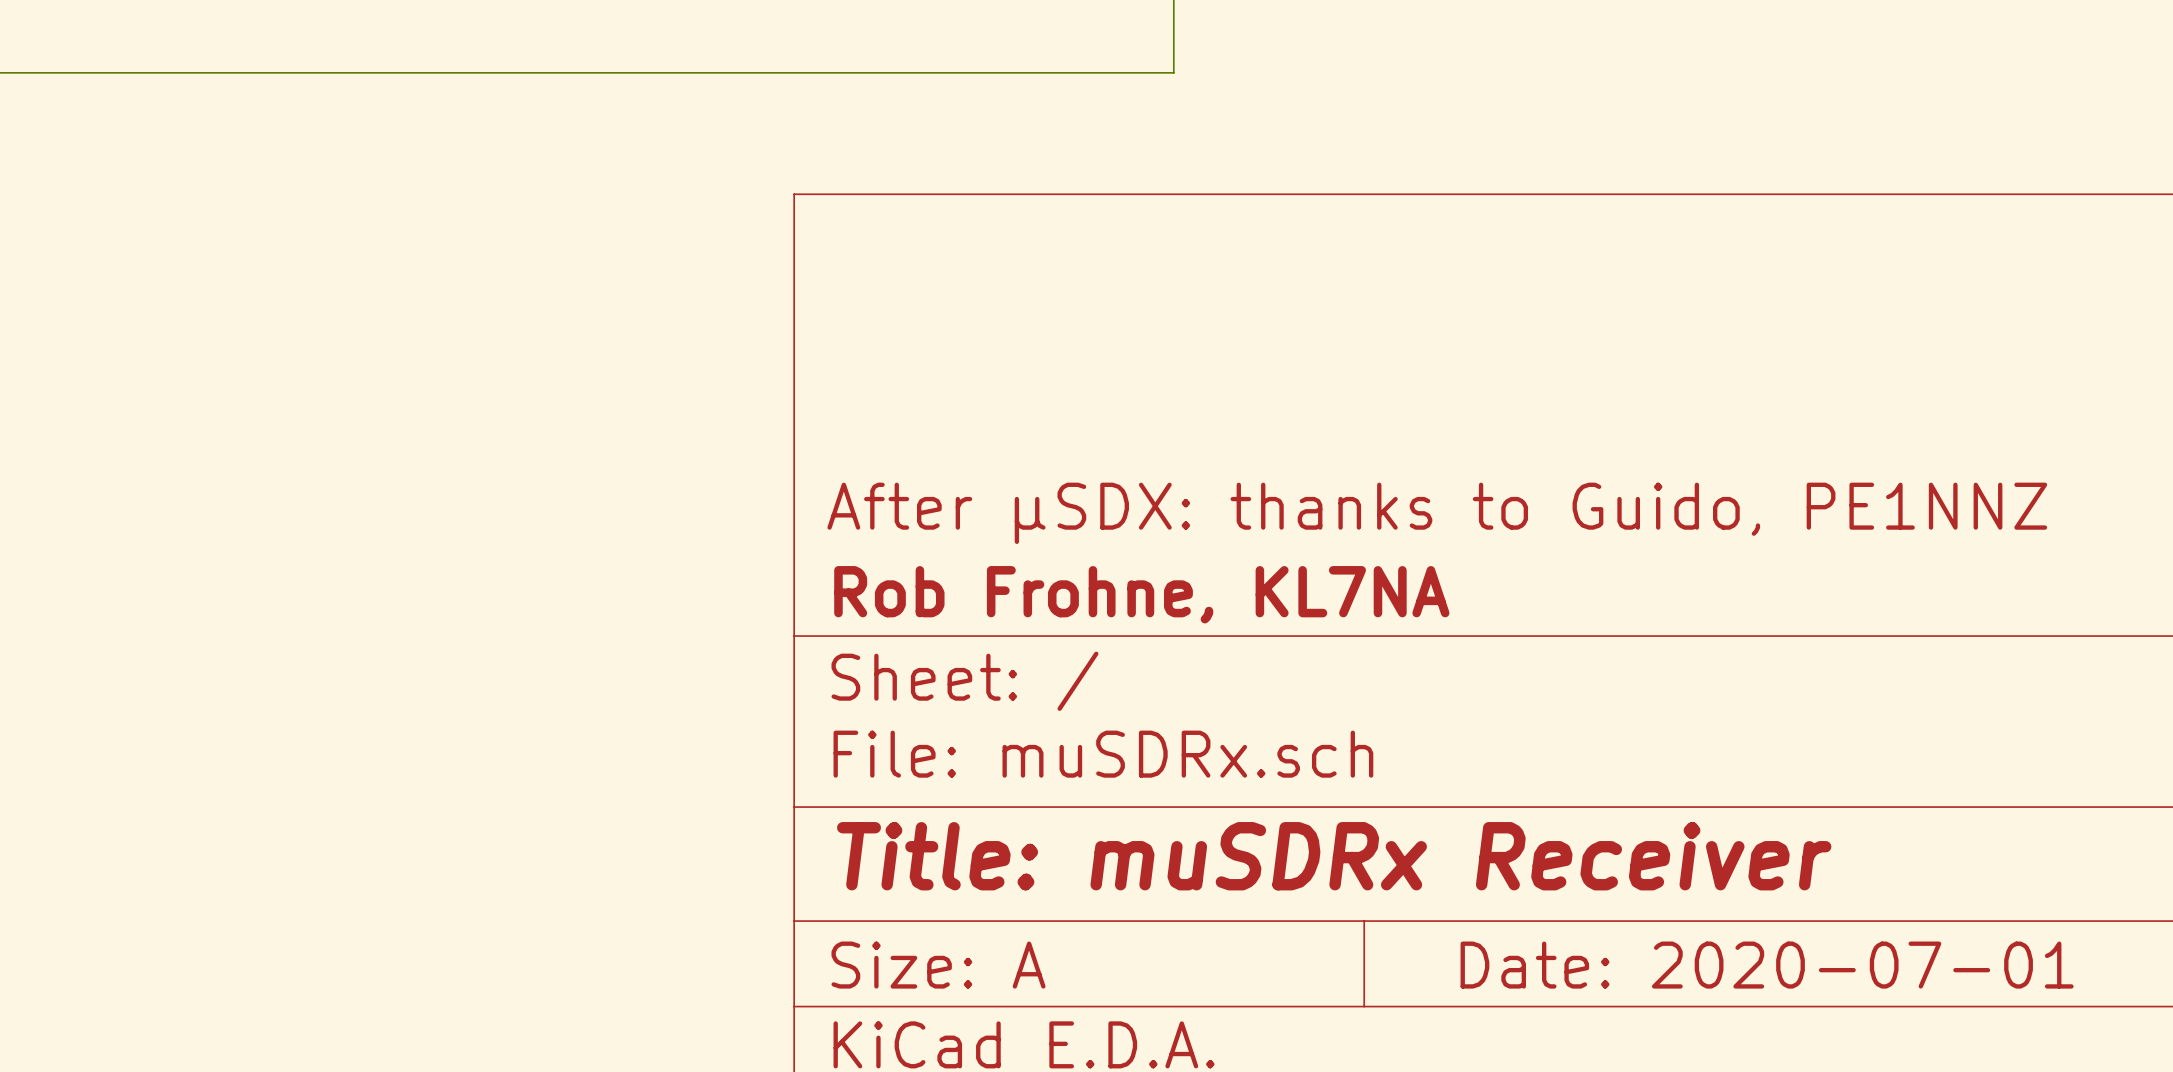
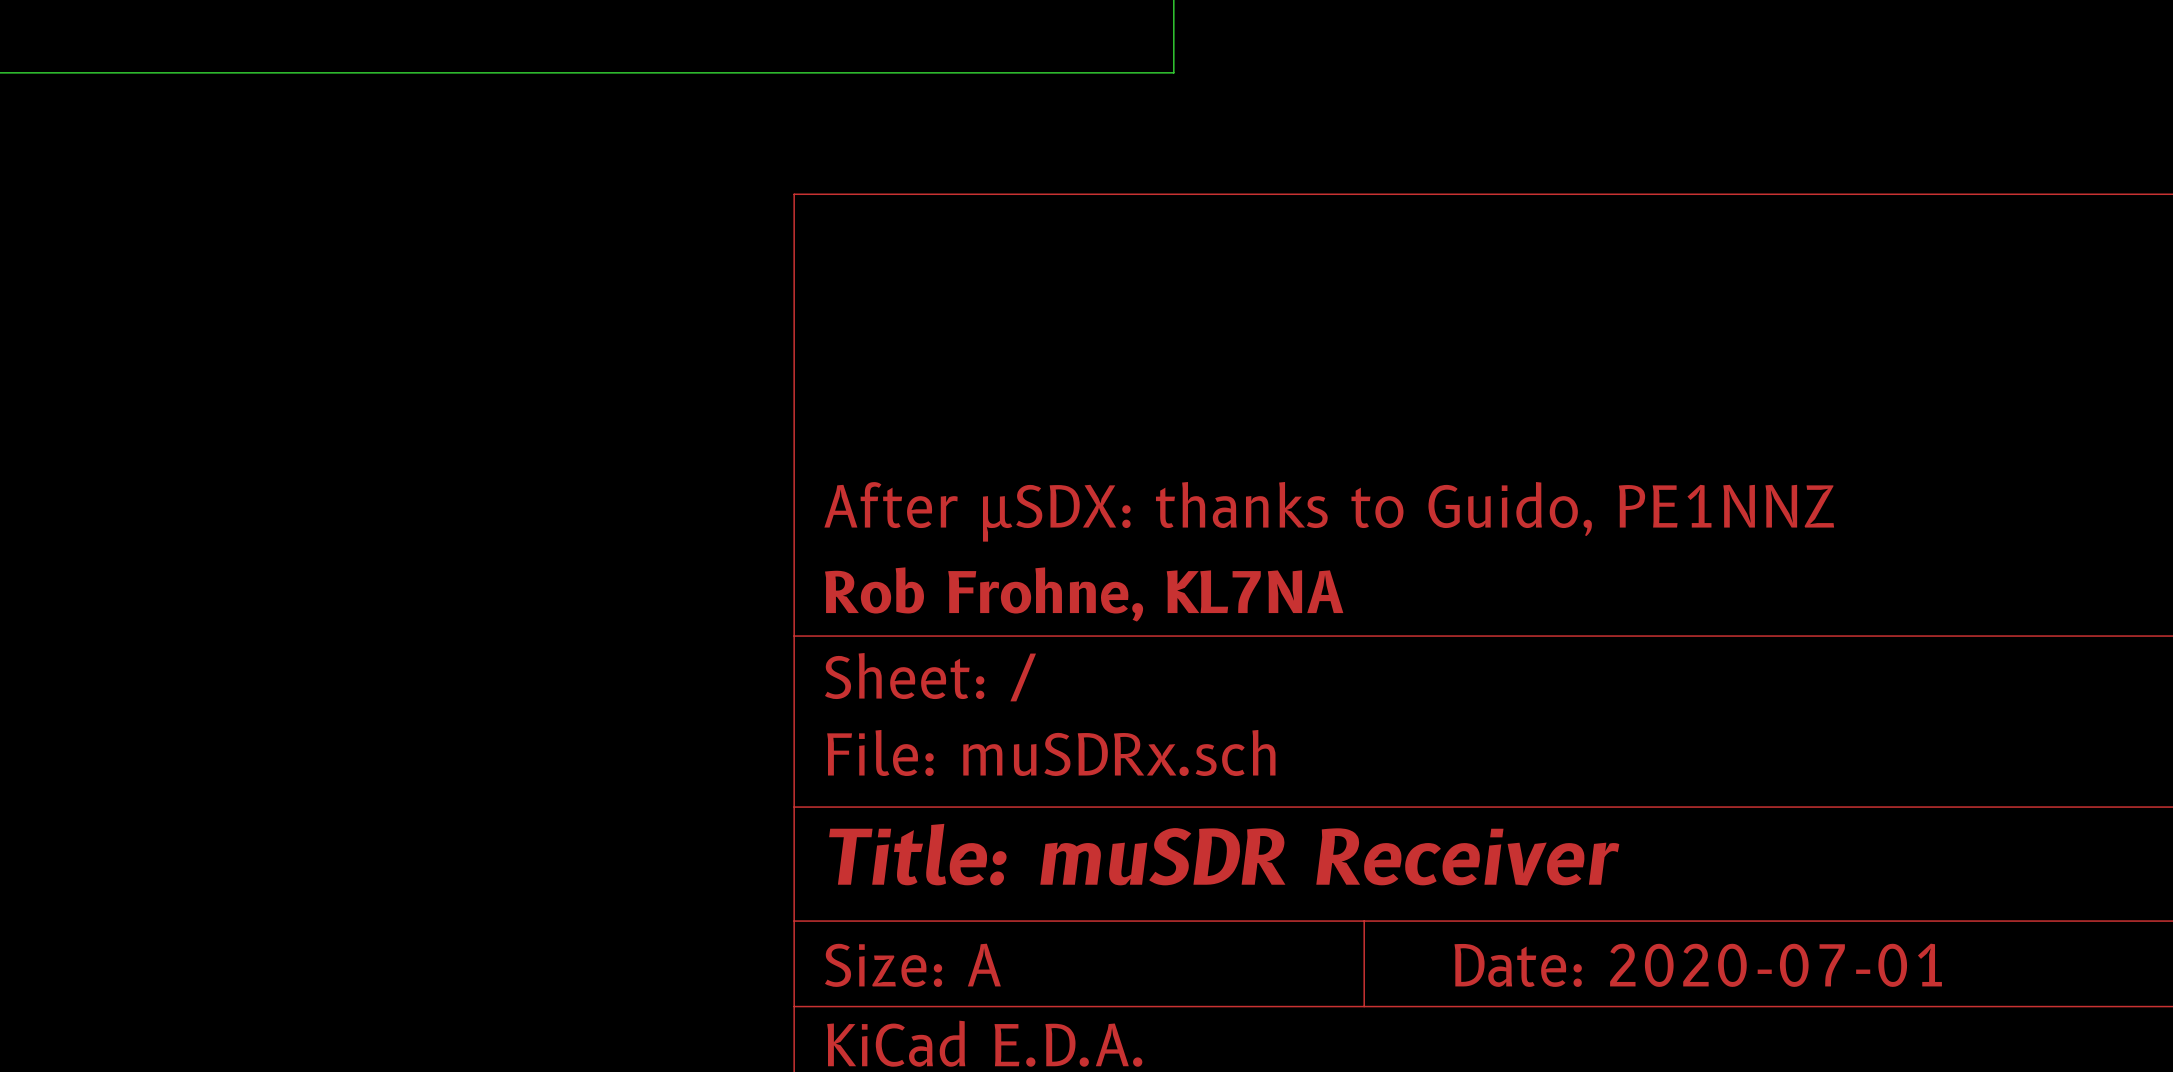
title block: Title: muSDRx Receiver (1334, 856) -> Title: muSDR Receiver (1224, 854)

